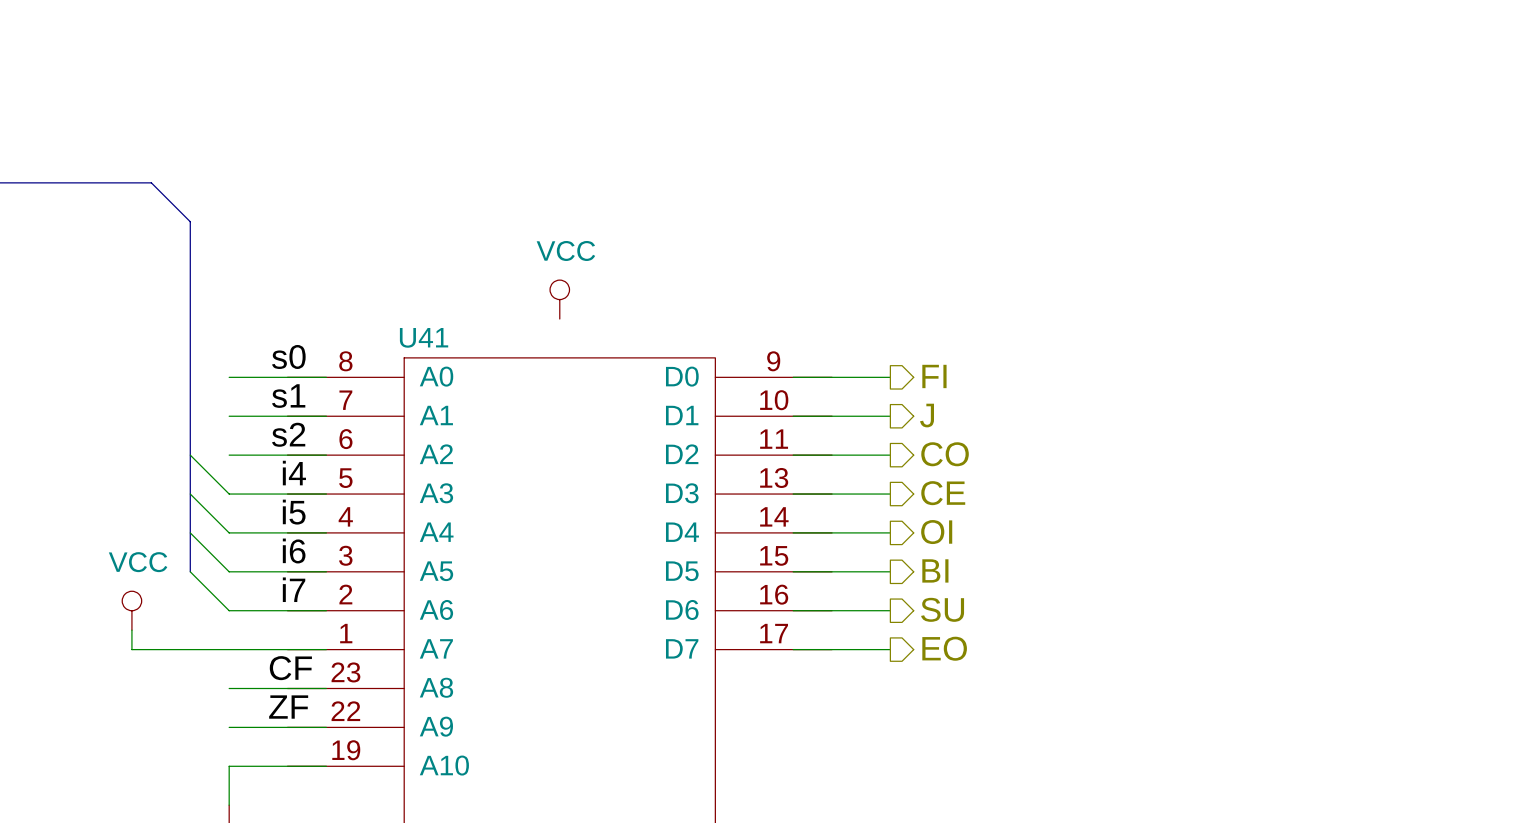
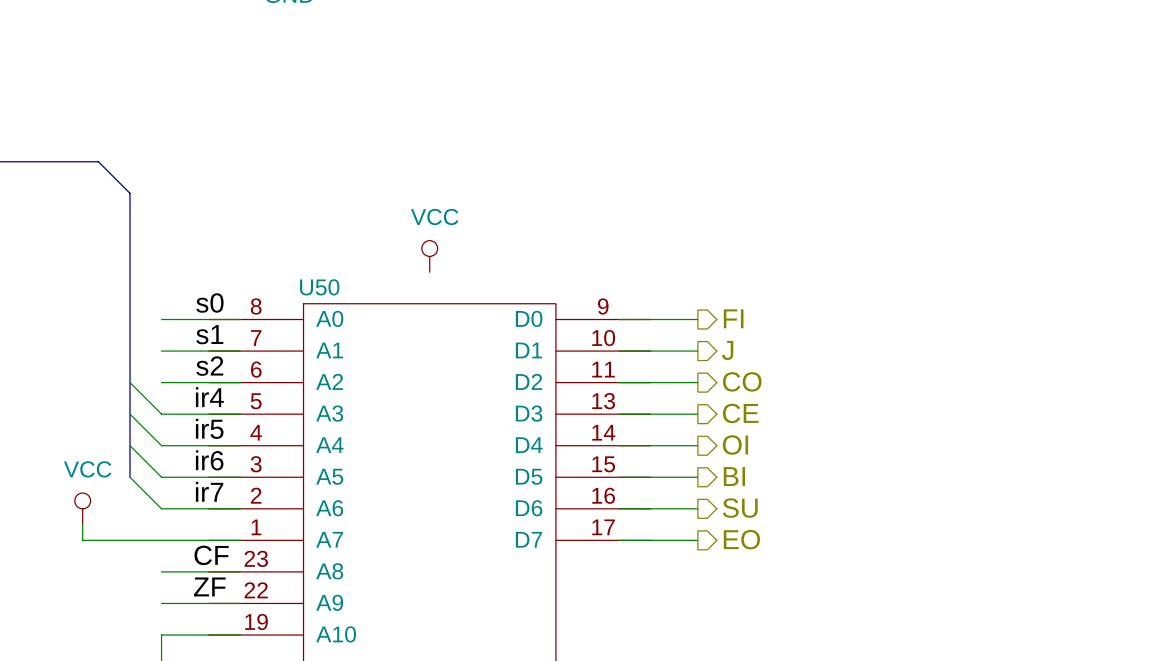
U41 name: U41 (424, 337) -> U50 (319, 287)
label: i4 (294, 473) -> ir4 (209, 397)
label: i5 (294, 512) -> ir5 (209, 428)
label: i6 (294, 551) -> ir6 (209, 460)
label: i7 (294, 589) -> ir7 (209, 491)

